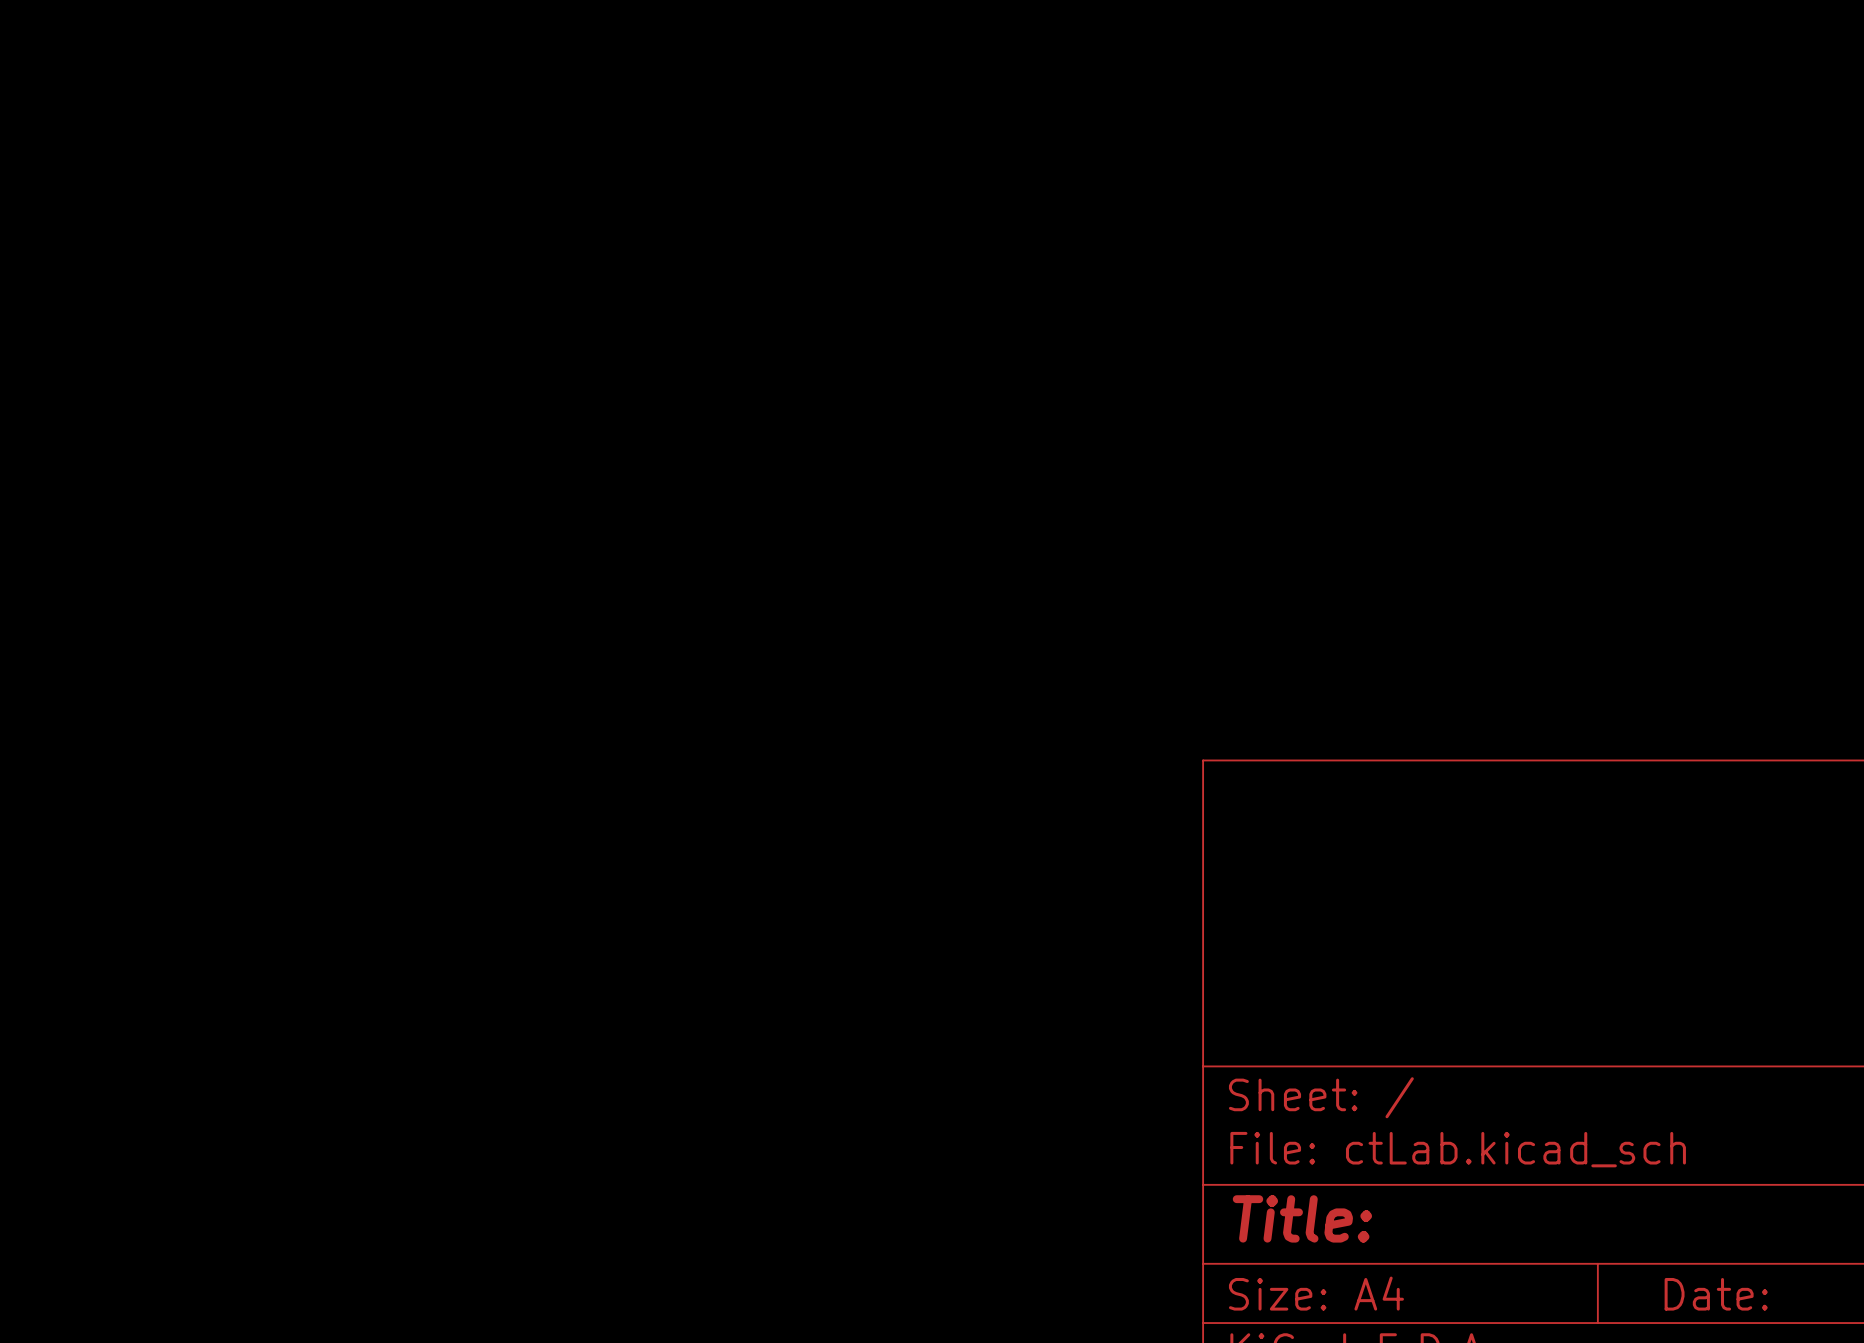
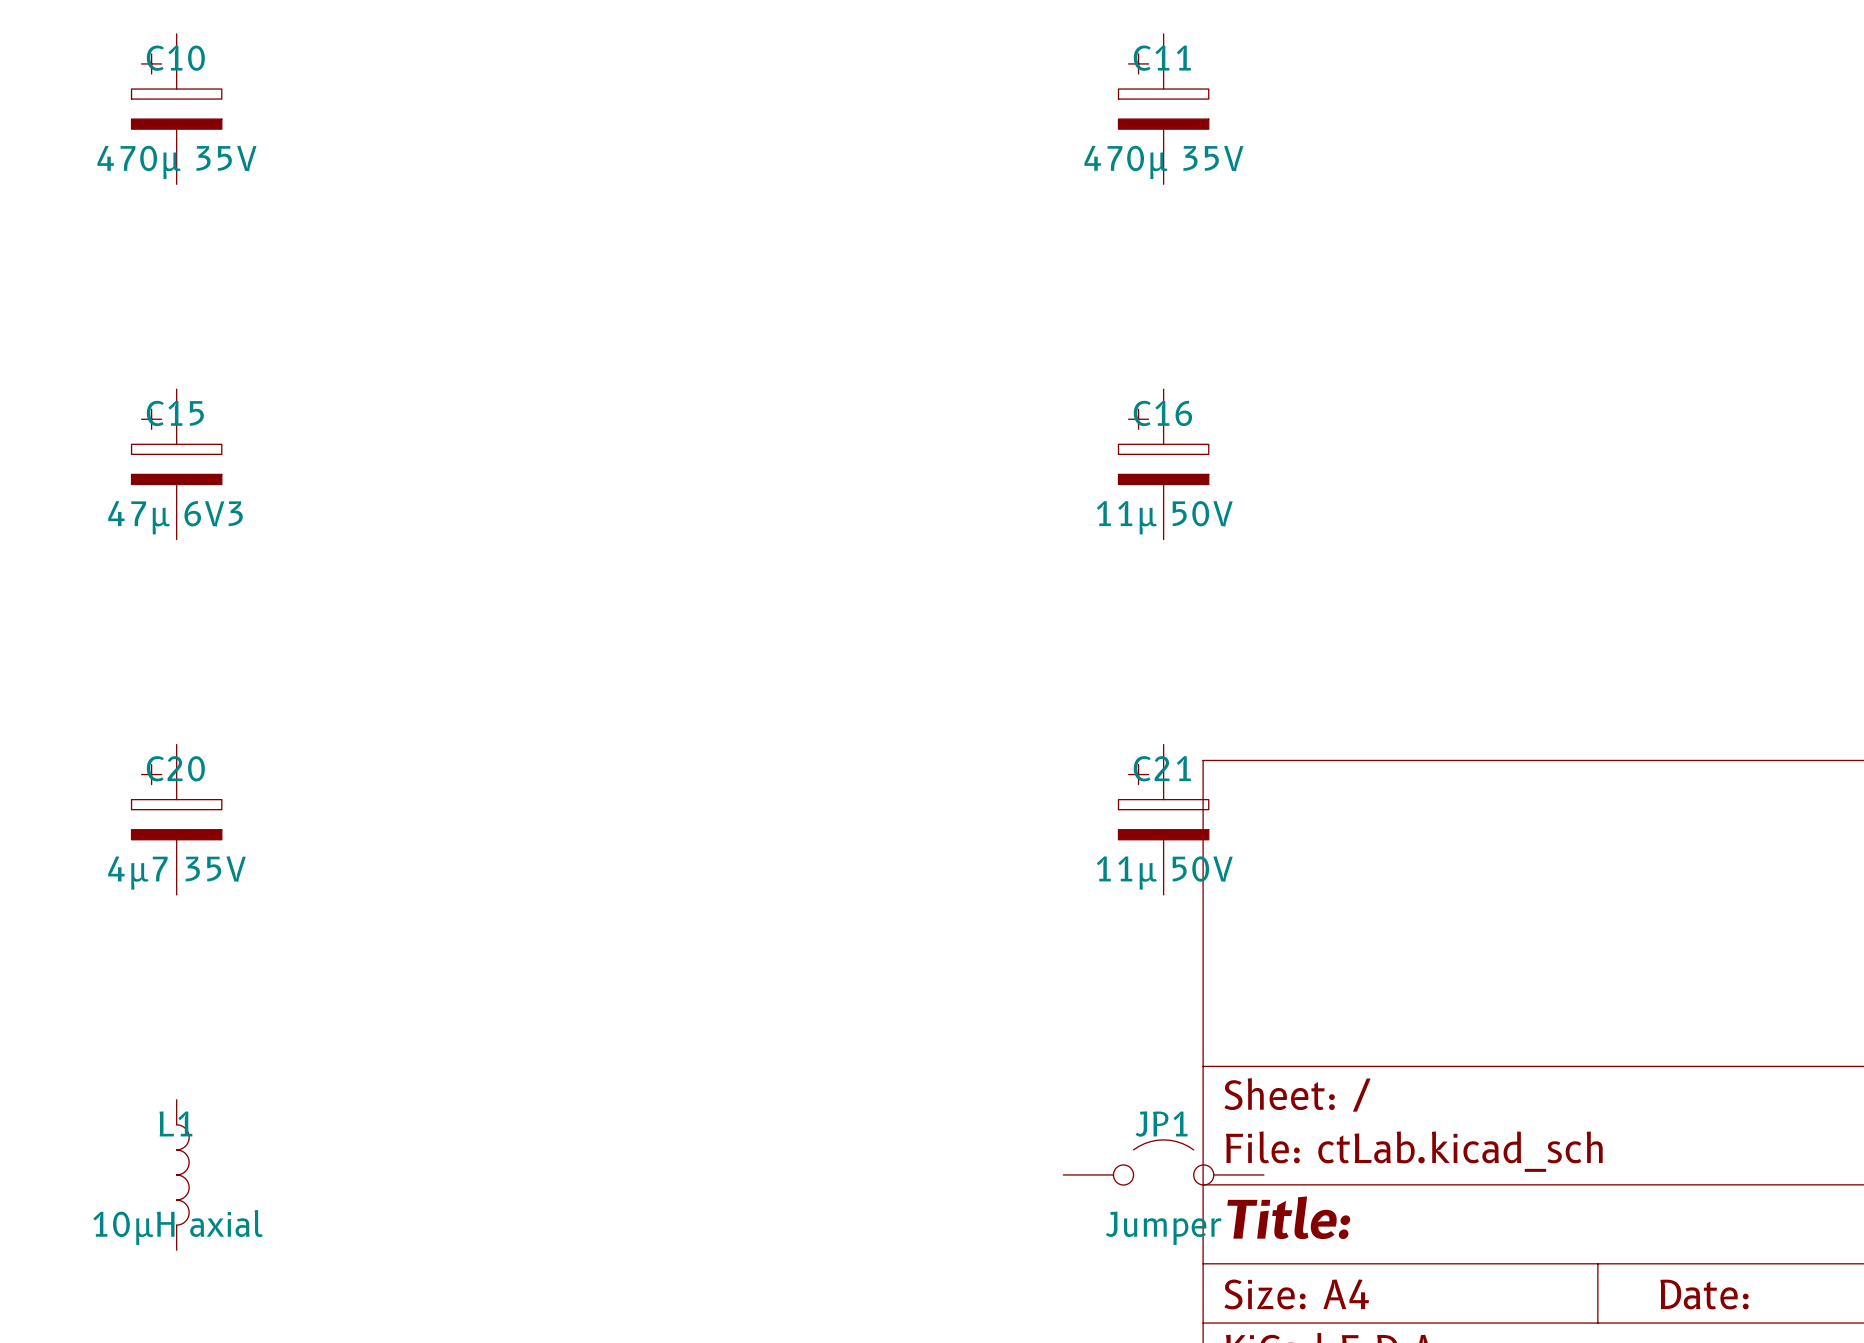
C10: none -> 470µ 35V (176, 109)
C11: none -> 470µ 35V (1163, 109)
C15: none -> 47µ 6V3 (176, 464)
C16: none -> 11µ 50V (1163, 464)
C20: none -> 4µ7 35V (176, 819)
C21: none -> 11µ 50V (1163, 819)
JP1: none -> Jumper (1163, 1162)
L1: none -> 10µH axial (182, 1174)

